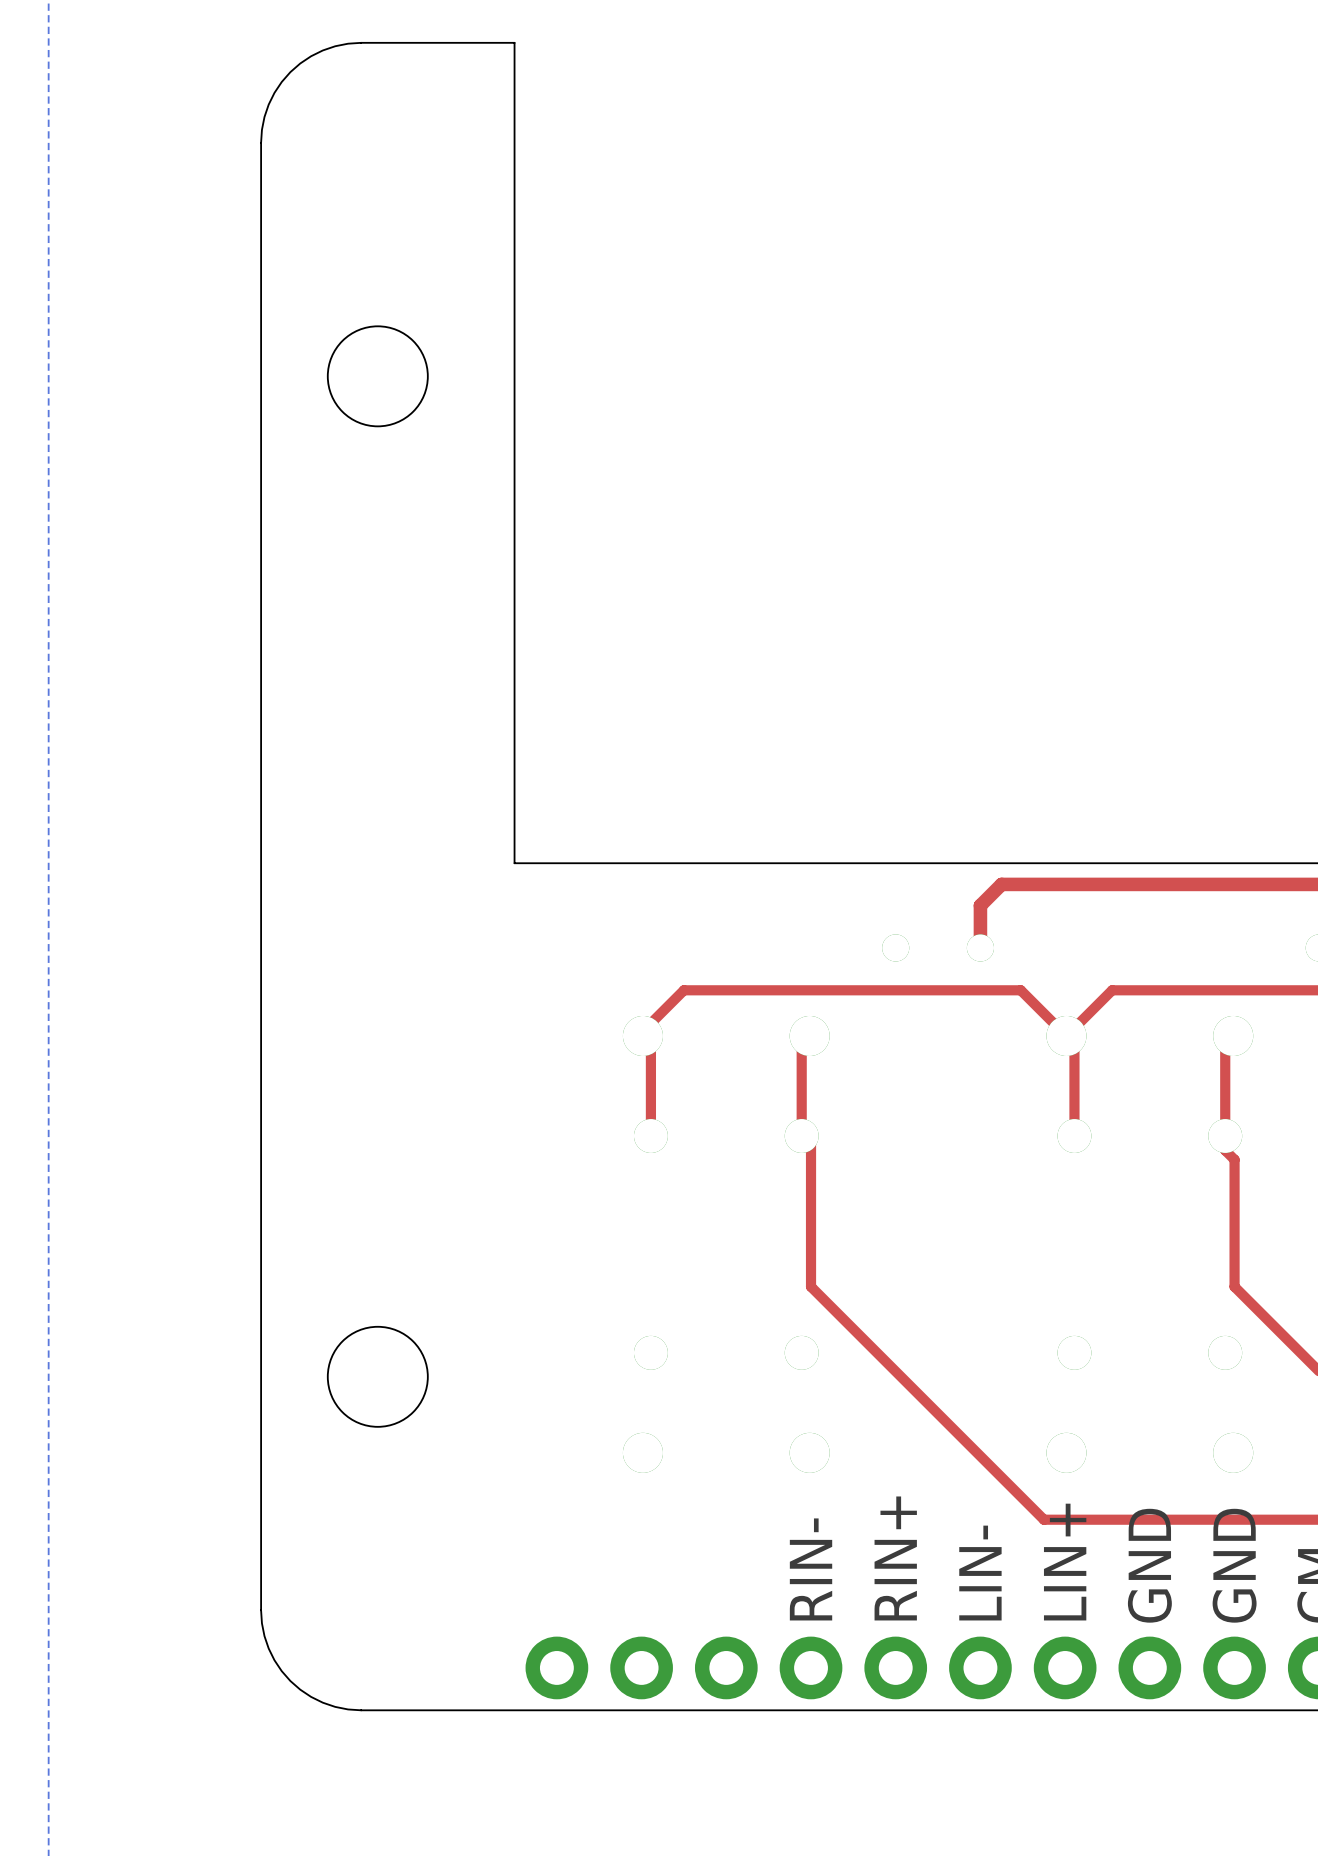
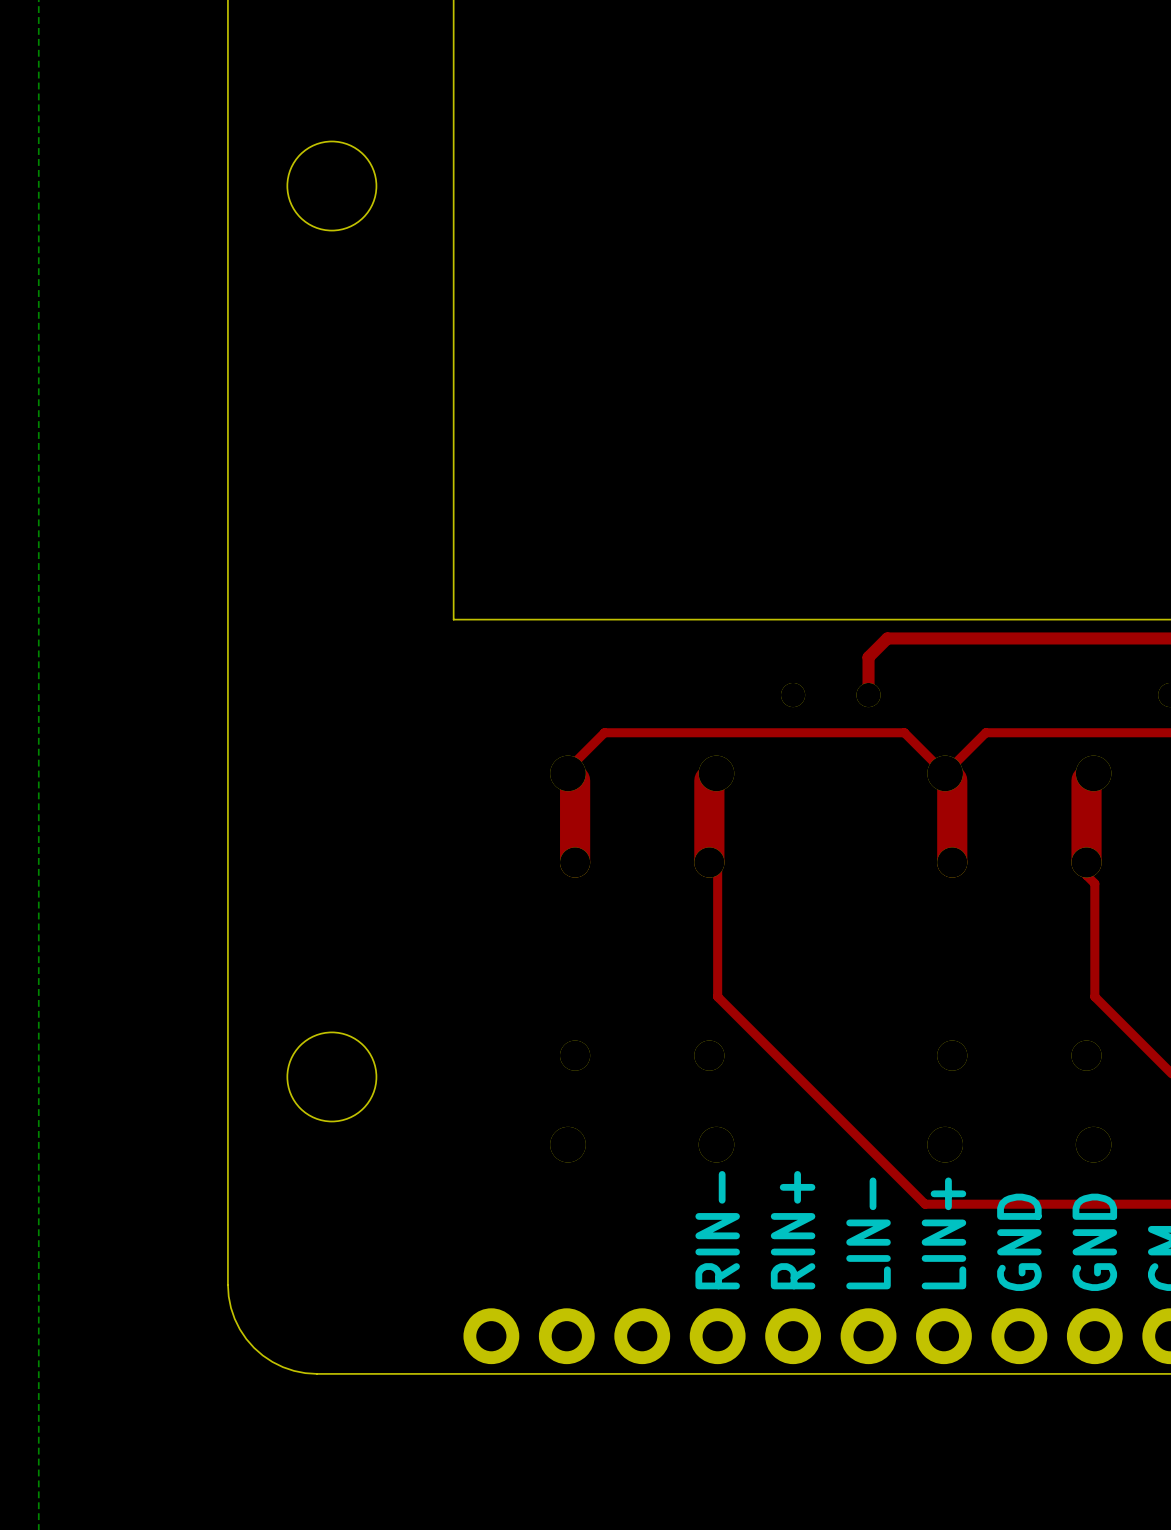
top track width: thin (650, 1043) (650, 1135) -> thick (575, 780) (575, 862)
top track width: thin (801, 1043) (801, 1135) -> thick (709, 780) (709, 862)
top track width: thin (1074, 1043) (1074, 1135) -> thick (952, 780) (952, 862)
top track width: thin (1225, 1043) (1225, 1135) -> thick (1086, 780) (1086, 862)

